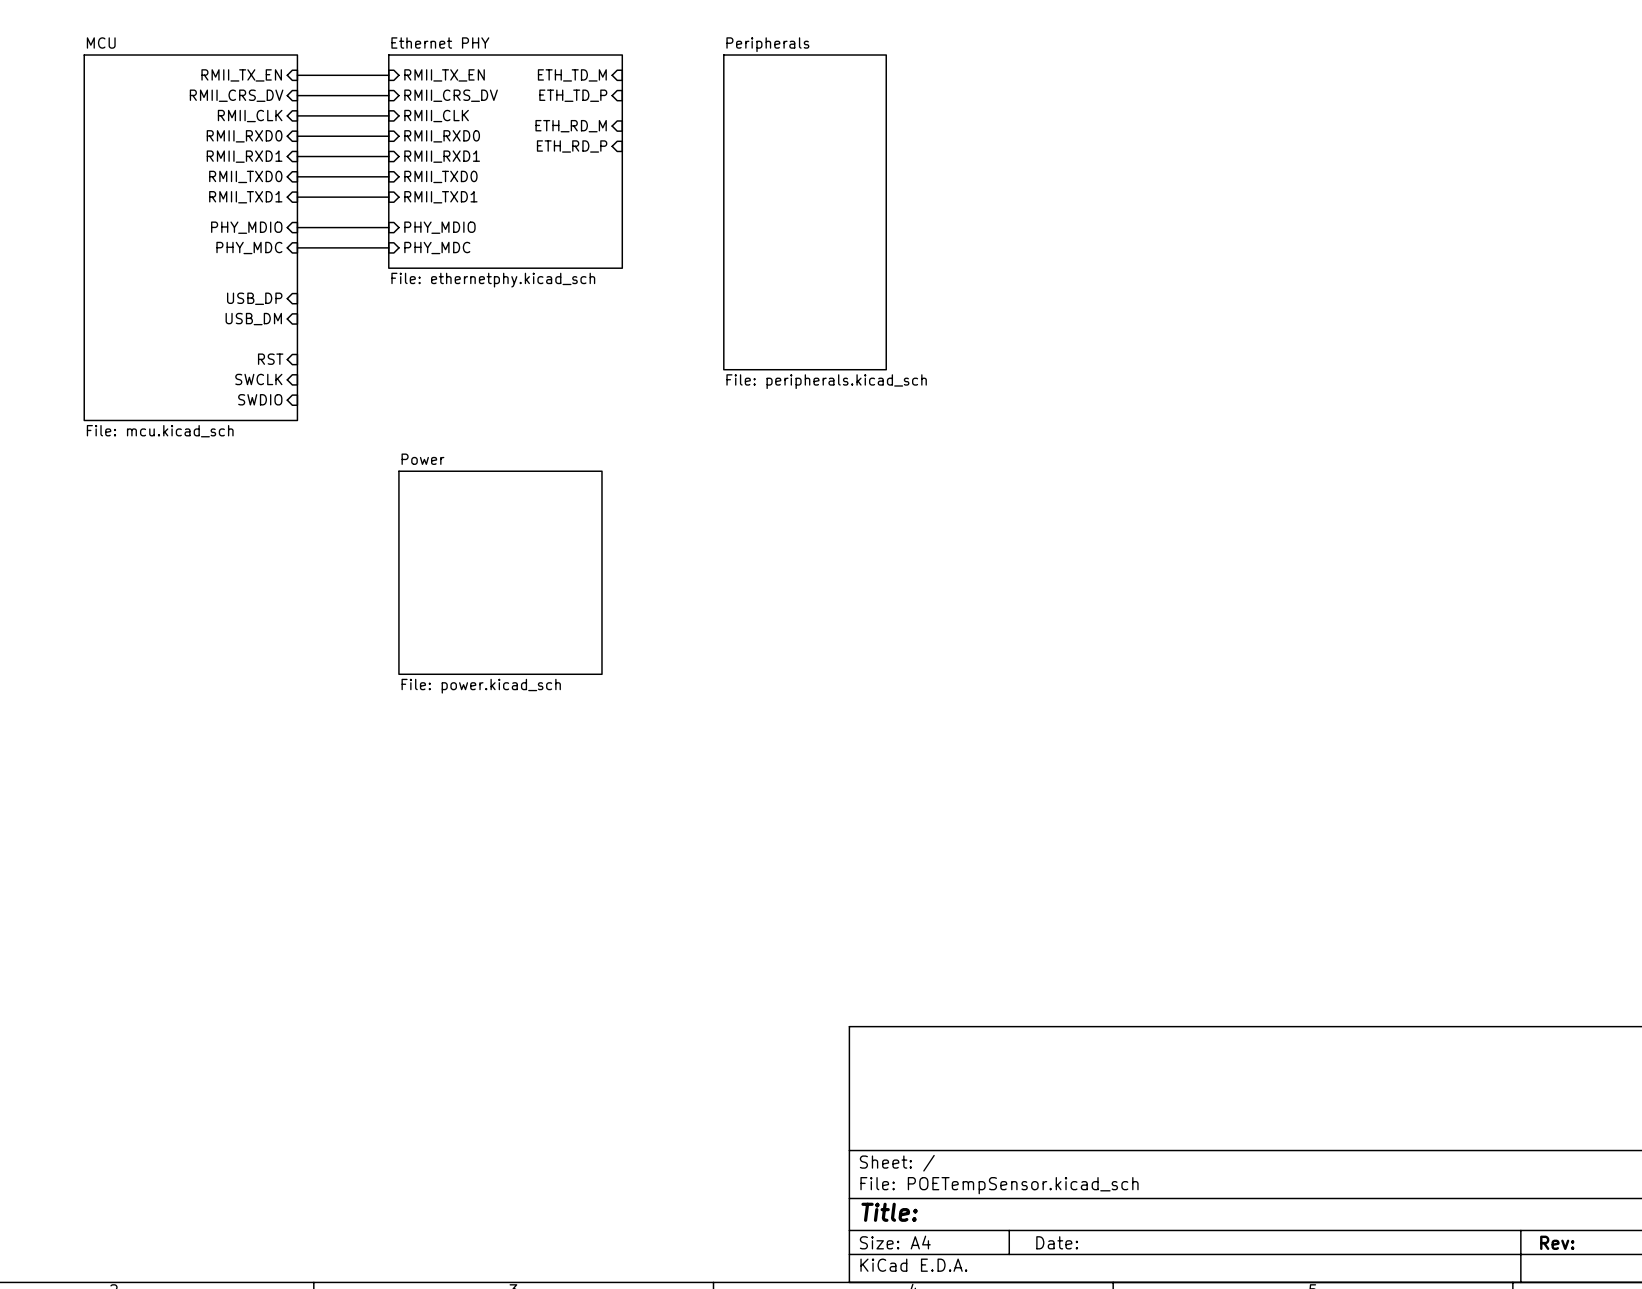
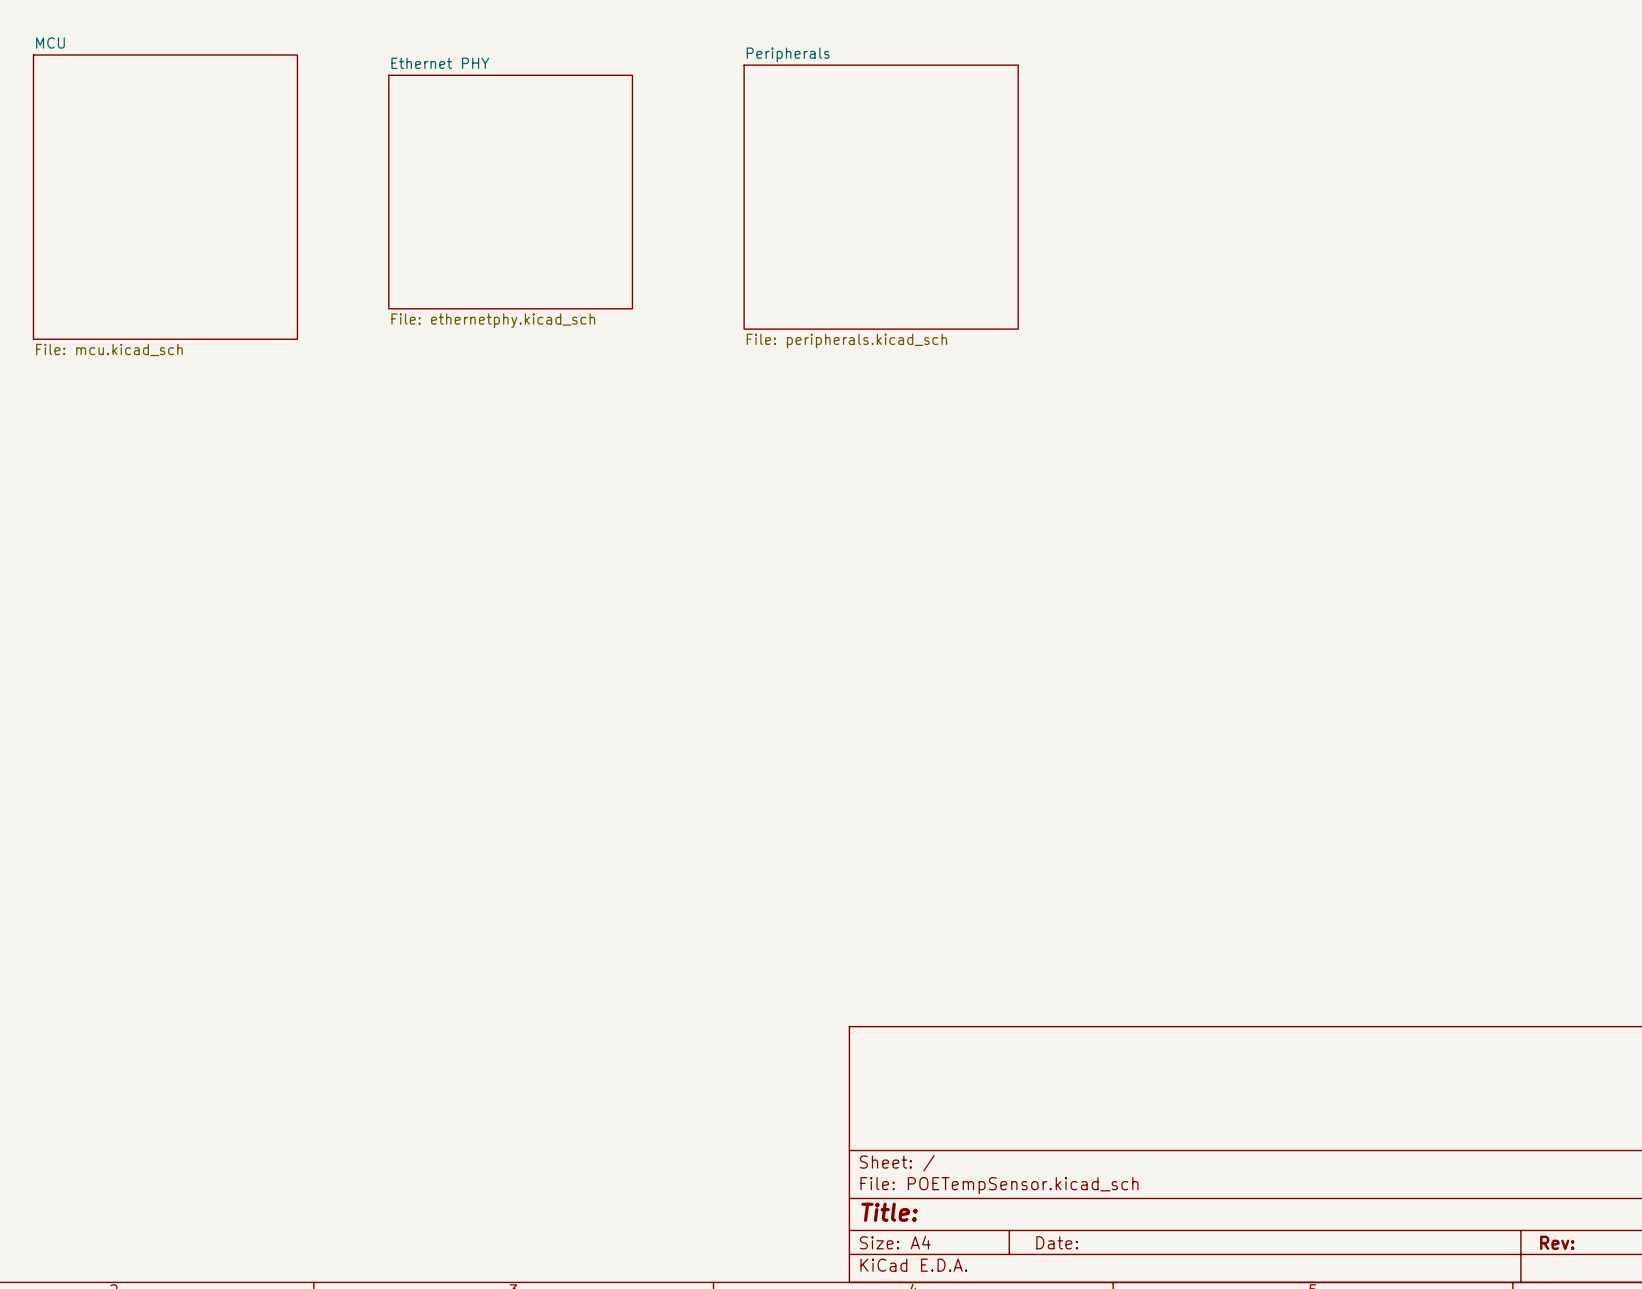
sheet pin: RMII_TX_EN (241, 75) -> none
wire: (297, 75) (388, 75) -> none
sheet pin: RMII_TX_EN (444, 75) -> none
sheet pin: ETH_TD_M (572, 75) -> none
sheet pin: RMII_CRS_DV (236, 95) -> none
wire: (297, 95) (388, 95) -> none
sheet pin: RMII_CRS_DV (451, 95) -> none
sheet pin: ETH_TD_P (573, 95) -> none
wire: (297, 115) (388, 115) -> none
sheet pin: RMII_CLK (250, 116) -> none
sheet pin: RMII_CLK (436, 116) -> none
sheet pin: ETH_RD_M (571, 126) -> none
sheet pin: RMII_RXD0 (244, 136) -> none
wire: (297, 136) (388, 136) -> none
sheet pin: RMII_RXD0 (442, 136) -> none
sheet pin: ETH_RD_P (572, 146) -> none
sheet pin: RMII_RXD1 (244, 156) -> none
wire: (297, 156) (388, 156) -> none
sheet pin: RMII_RXD1 (442, 156) -> none
sheet Ethernet PHY: File: ethernetphy.kicad_sch (505, 161) -> none
sheet pin: RMII_TXD0 (245, 176) -> none
wire: (297, 176) (388, 176) -> none
sheet pin: RMII_TXD0 (440, 176) -> none
sheet Ethernet PHY: none -> File: ethernetphy.kicad_sch (510, 192)
sheet MCU: none -> File: mcu.kicad_sch (165, 197)
sheet pin: RMII_TXD1 (245, 197) -> none
wire: (297, 197) (388, 197) -> none
sheet pin: RMII_TXD1 (440, 197) -> none
sheet Peripherals: none -> File: peripherals.kicad_sch (881, 197)
sheet Peripherals: File: peripherals.kicad_sch (805, 212) -> none
sheet pin: PHY_MDIO (246, 227) -> none
wire: (297, 227) (388, 227) -> none
sheet pin: PHY_MDIO (439, 227) -> none
sheet MCU: File: mcu.kicad_sch (190, 237) -> none
sheet pin: PHY_MDC (249, 247) -> none
wire: (297, 247) (388, 247) -> none
sheet pin: PHY_MDC (437, 247) -> none
sheet pin: USB_DP (254, 298) -> none
sheet pin: USB_DM (253, 319) -> none
sheet pin: RST (270, 359) -> none
sheet pin: SWCLK (258, 379) -> none
sheet pin: SWDIO (260, 399) -> none
sheet Power: File: power.kicad_sch (500, 572) -> none

